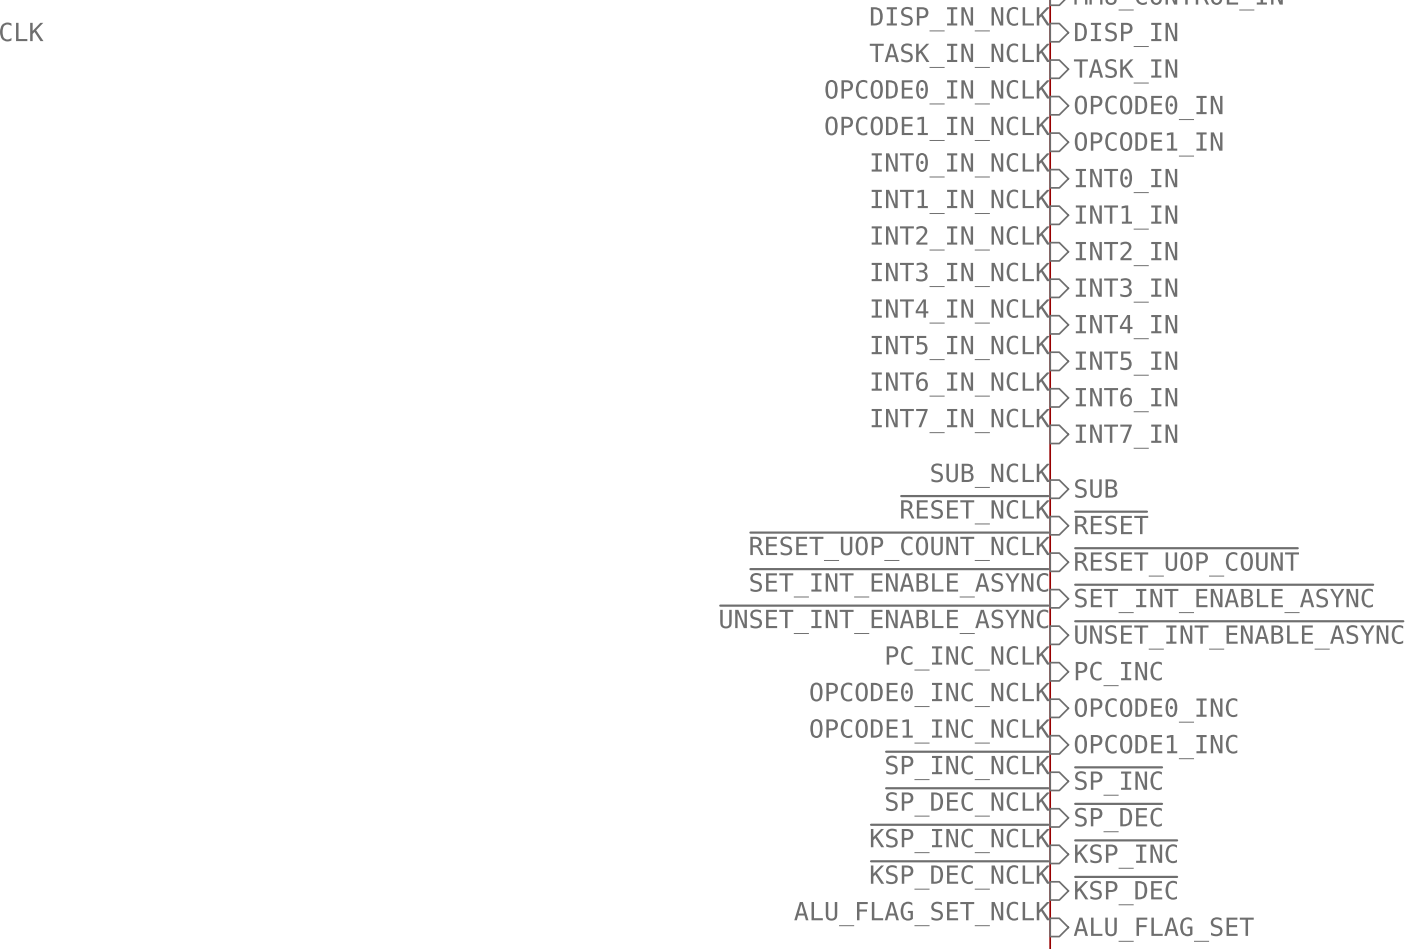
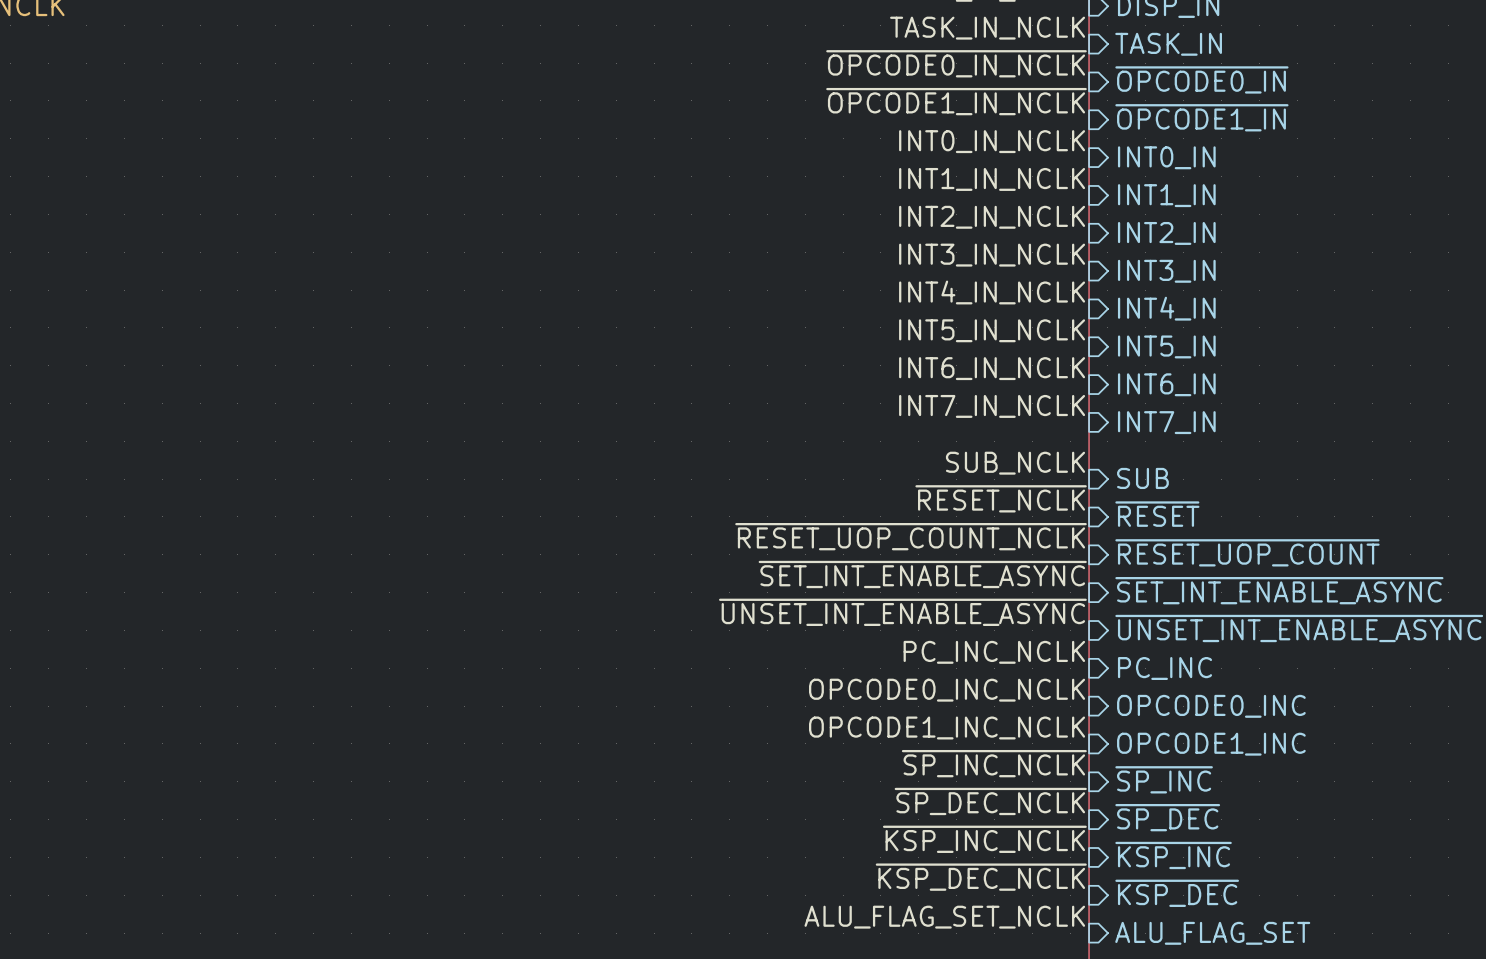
label: OPCODE0_IN_NCLK (937, 92) -> ~{OPCODE0_IN_NCLK} (956, 63)
sheet pin: OPCODE0_IN (1148, 107) -> ~{OPCODE0_IN} (1201, 79)
label: OPCODE1_IN_NCLK (937, 128) -> ~{OPCODE1_IN_NCLK} (956, 101)
sheet pin: OPCODE1_IN (1148, 144) -> ~{OPCODE1_IN} (1201, 117)

